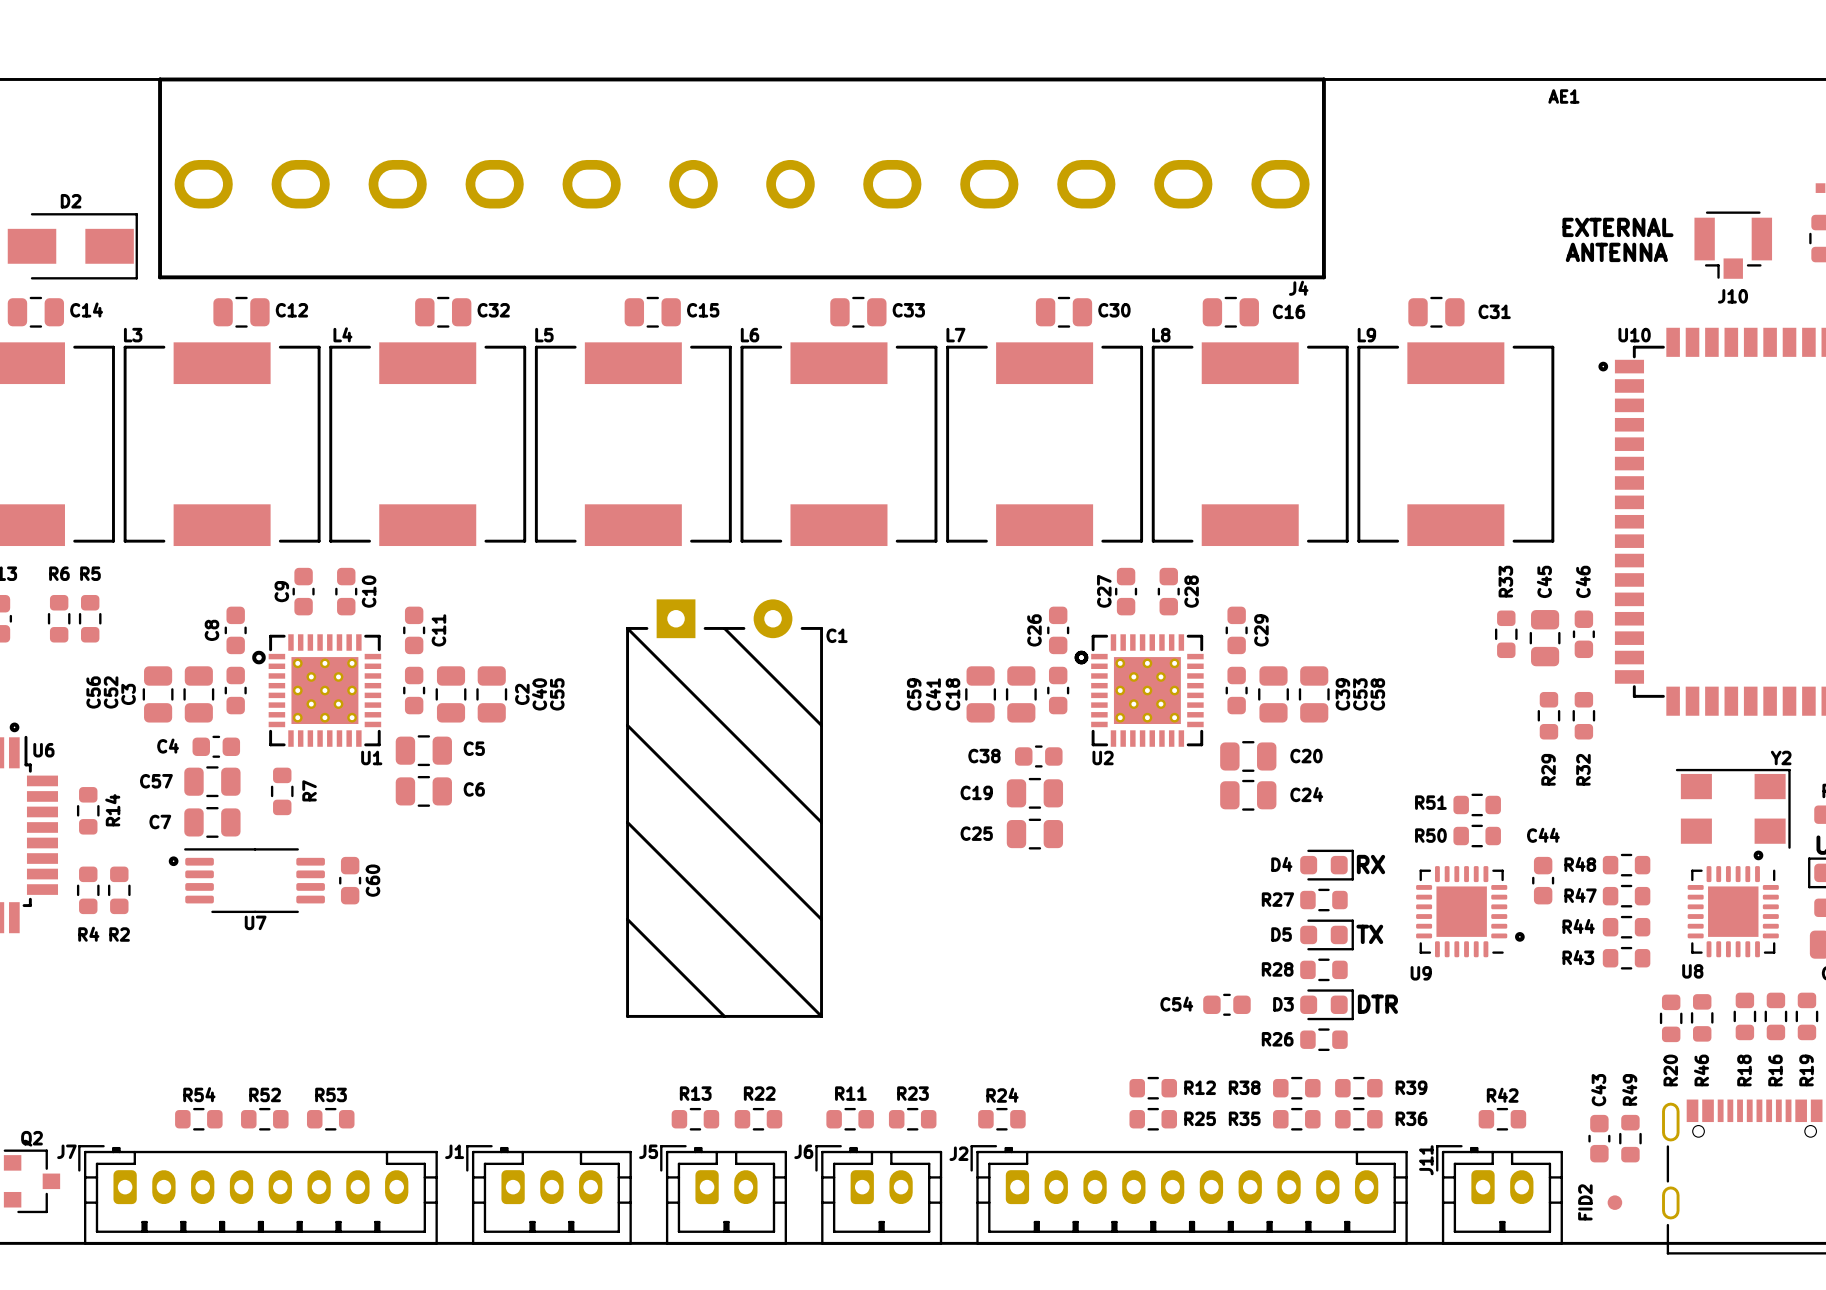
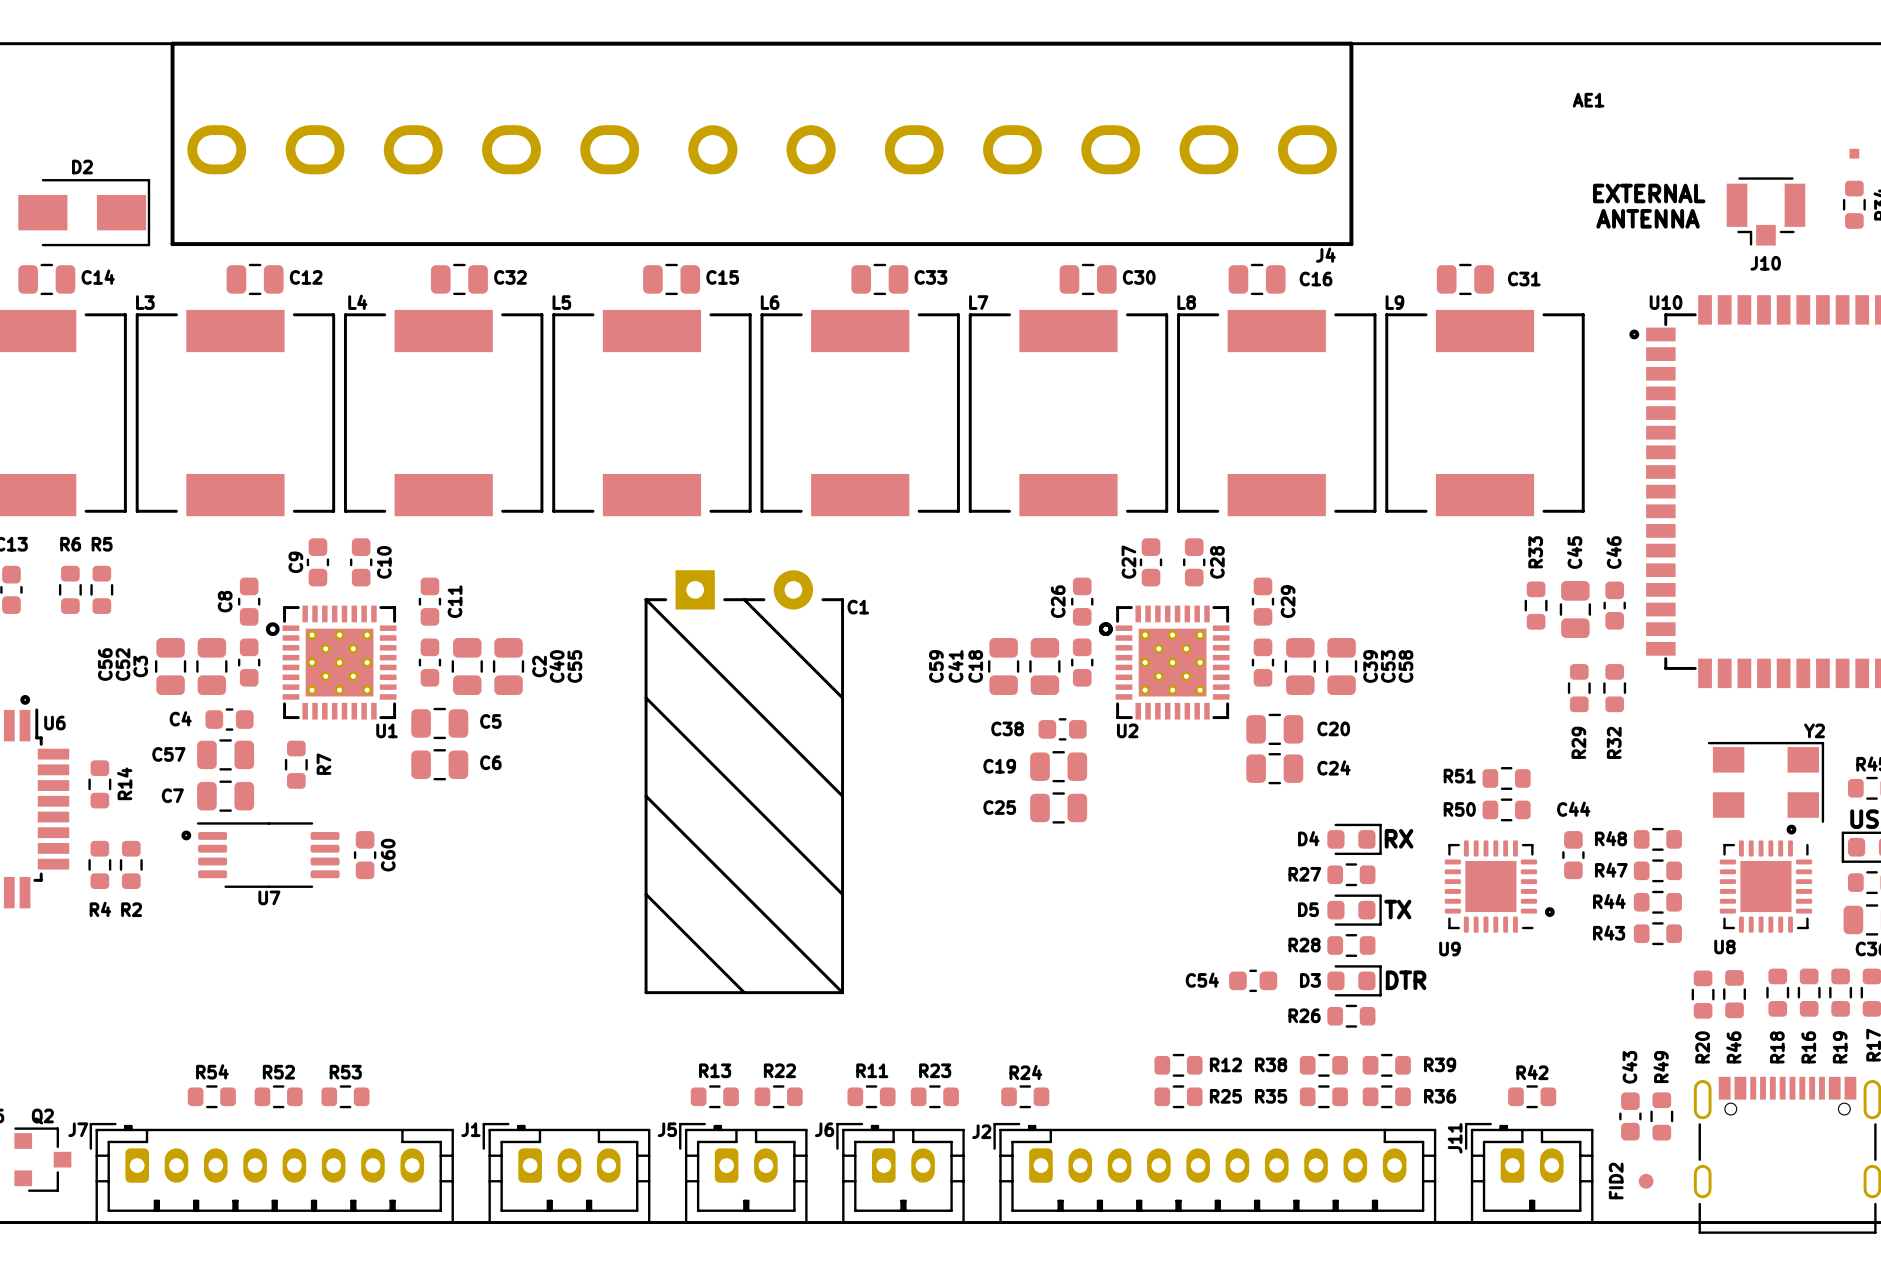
AE1 name position: AE1 (1563, 96) -> AE1 (1588, 100)

